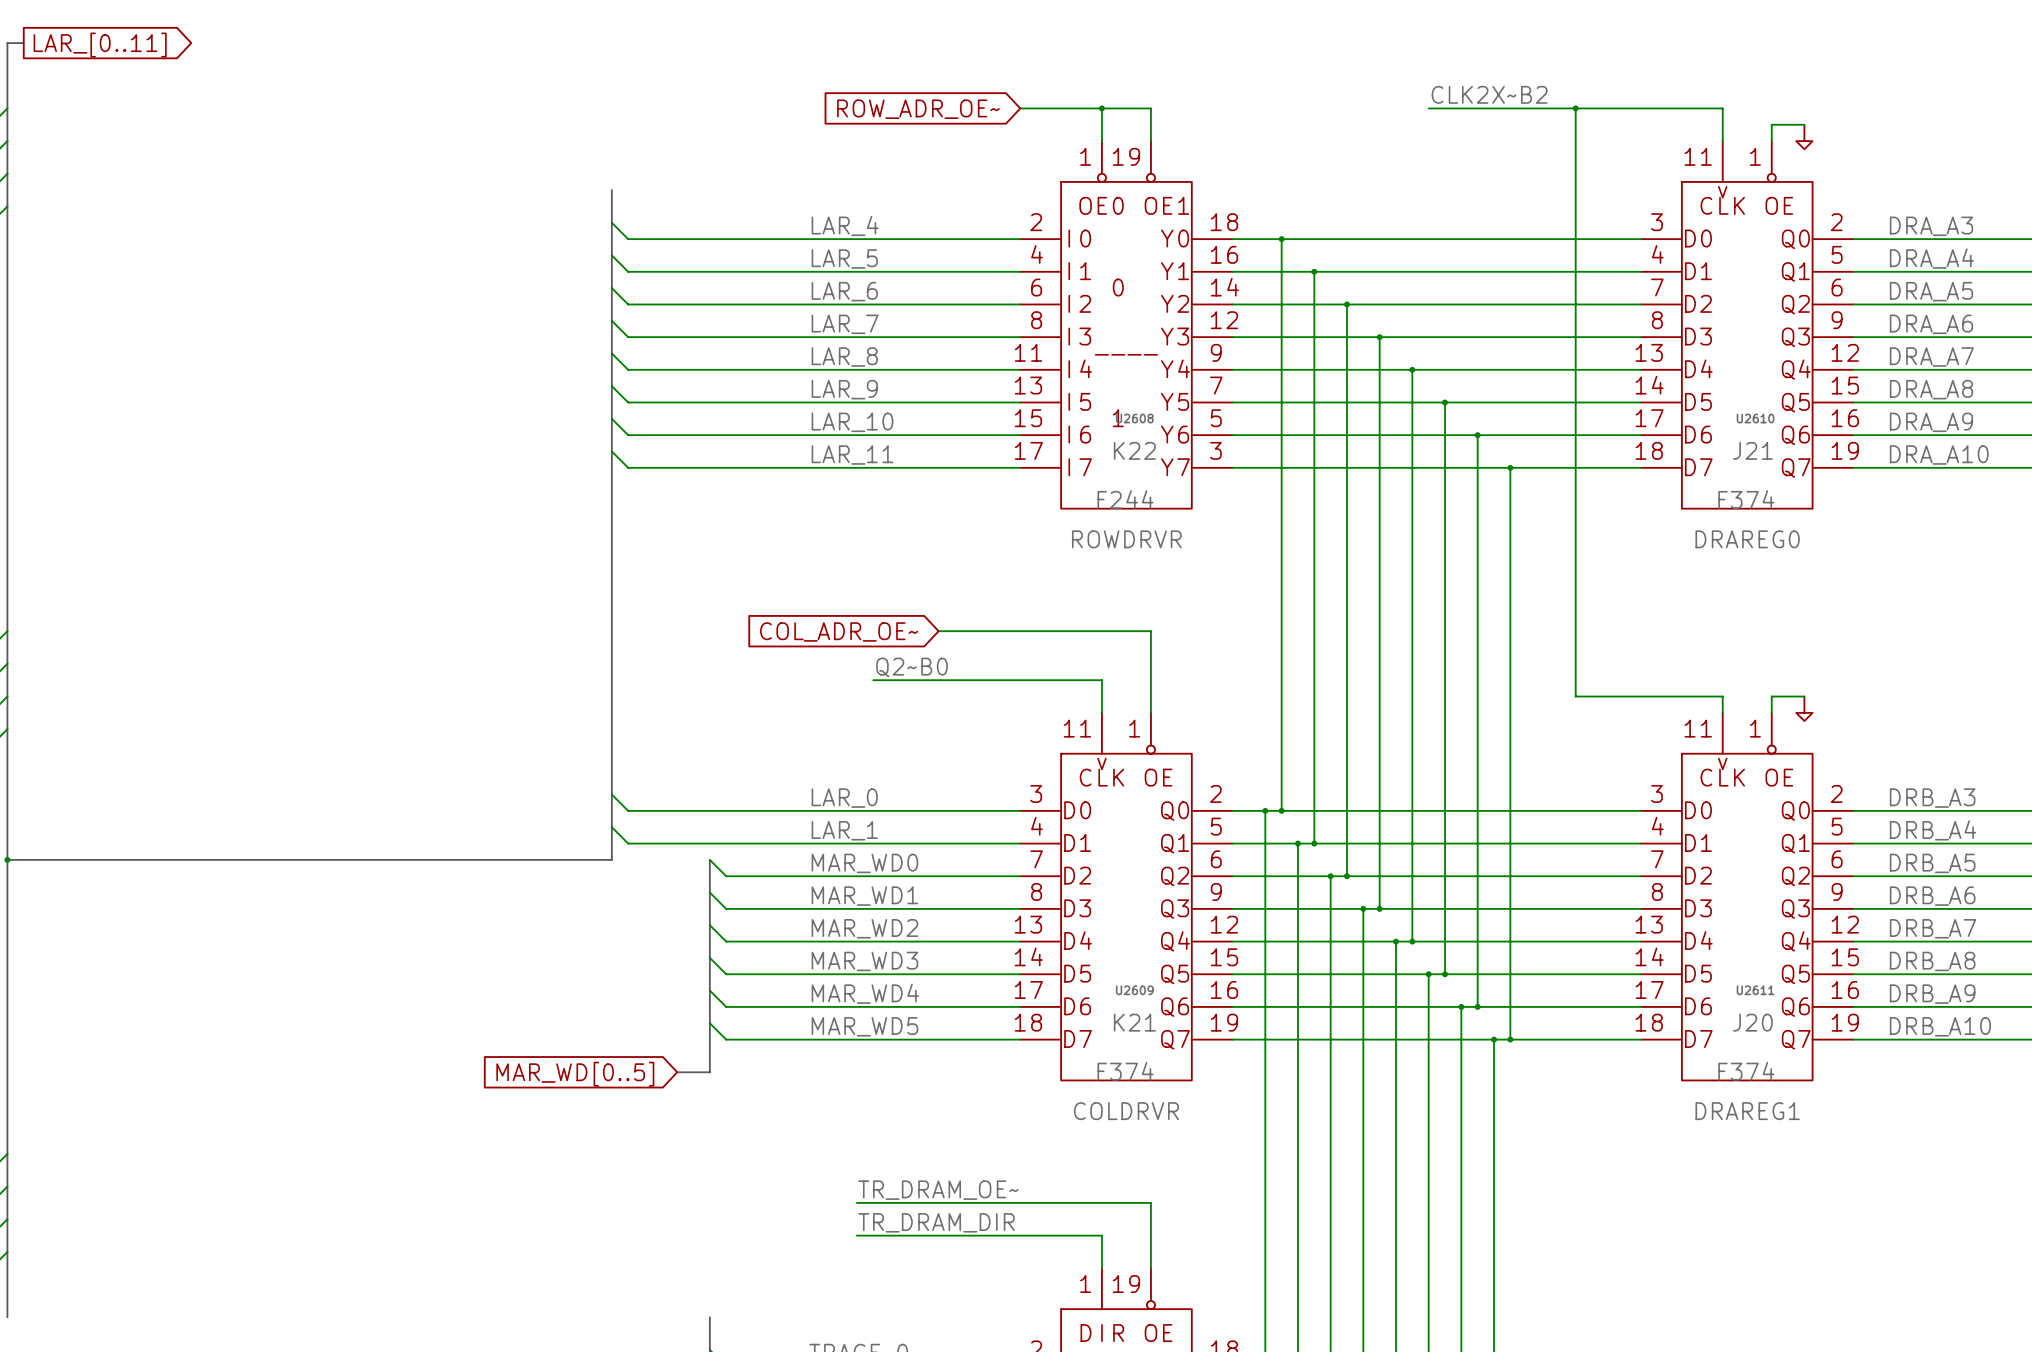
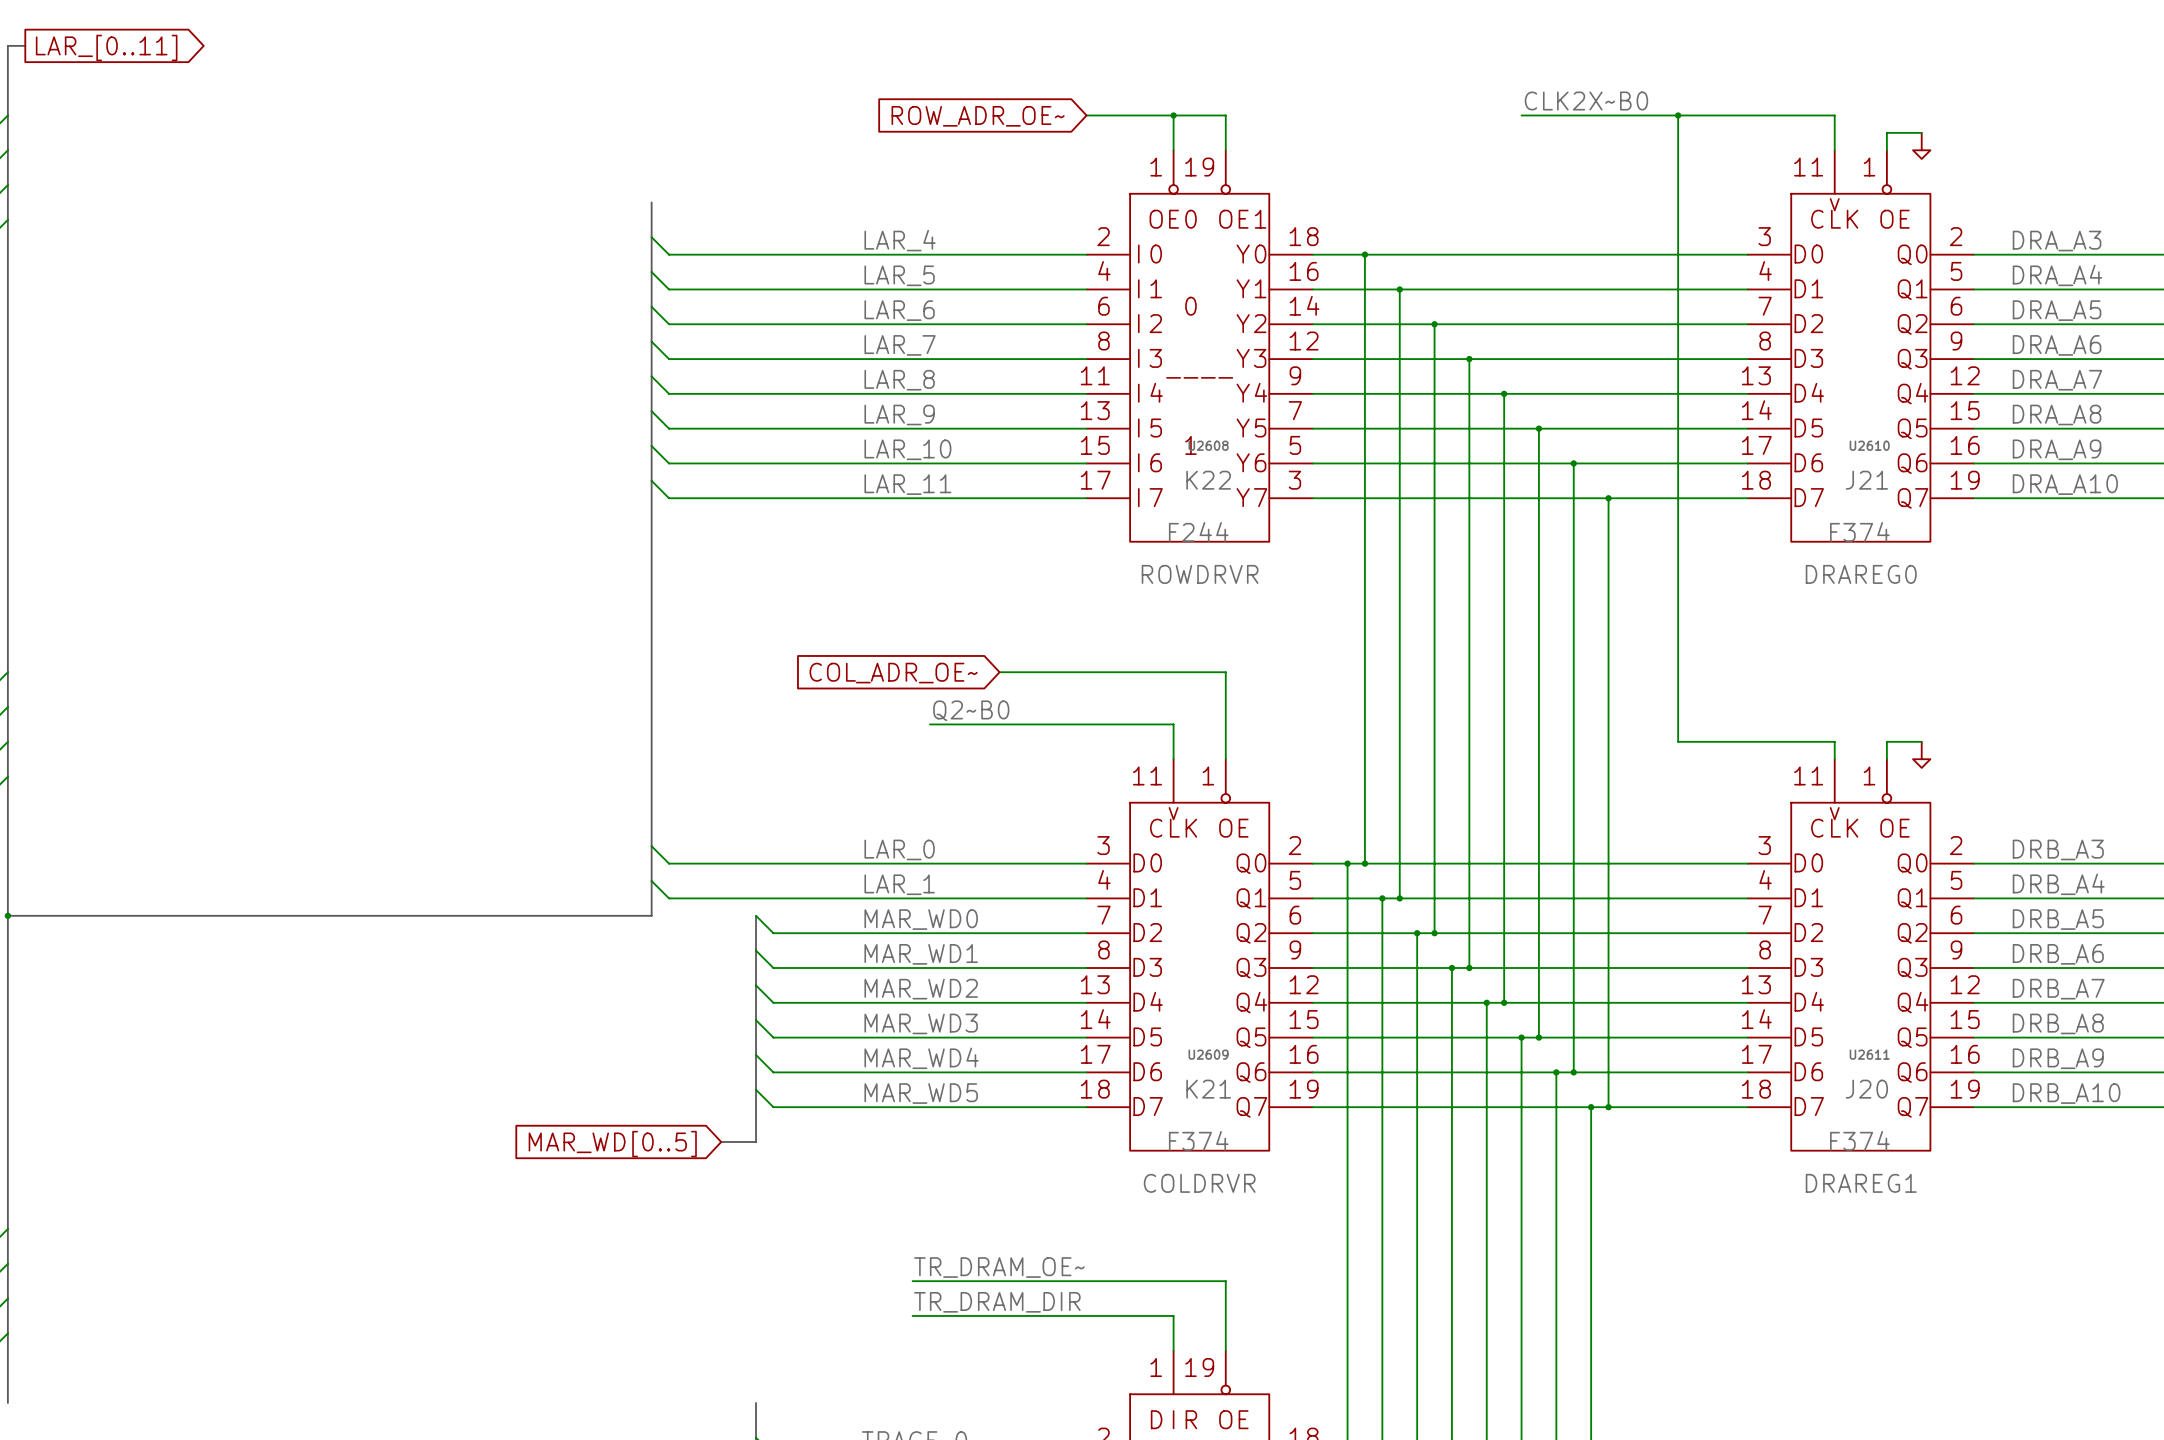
label: CLK2X~B2 (1489, 94) -> CLK2X~B0 (1586, 101)

